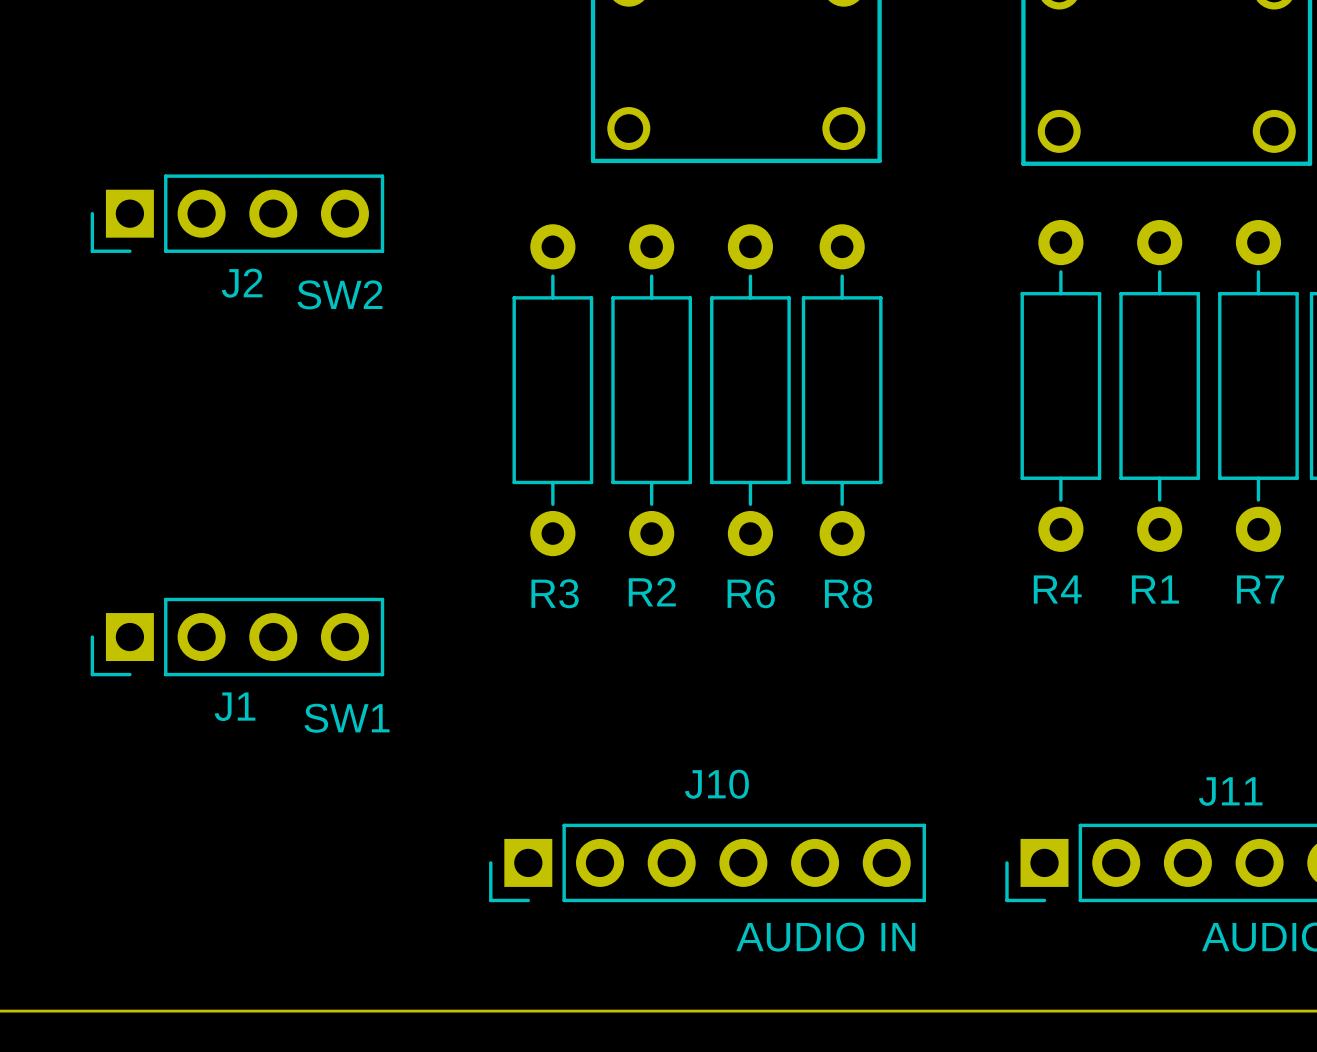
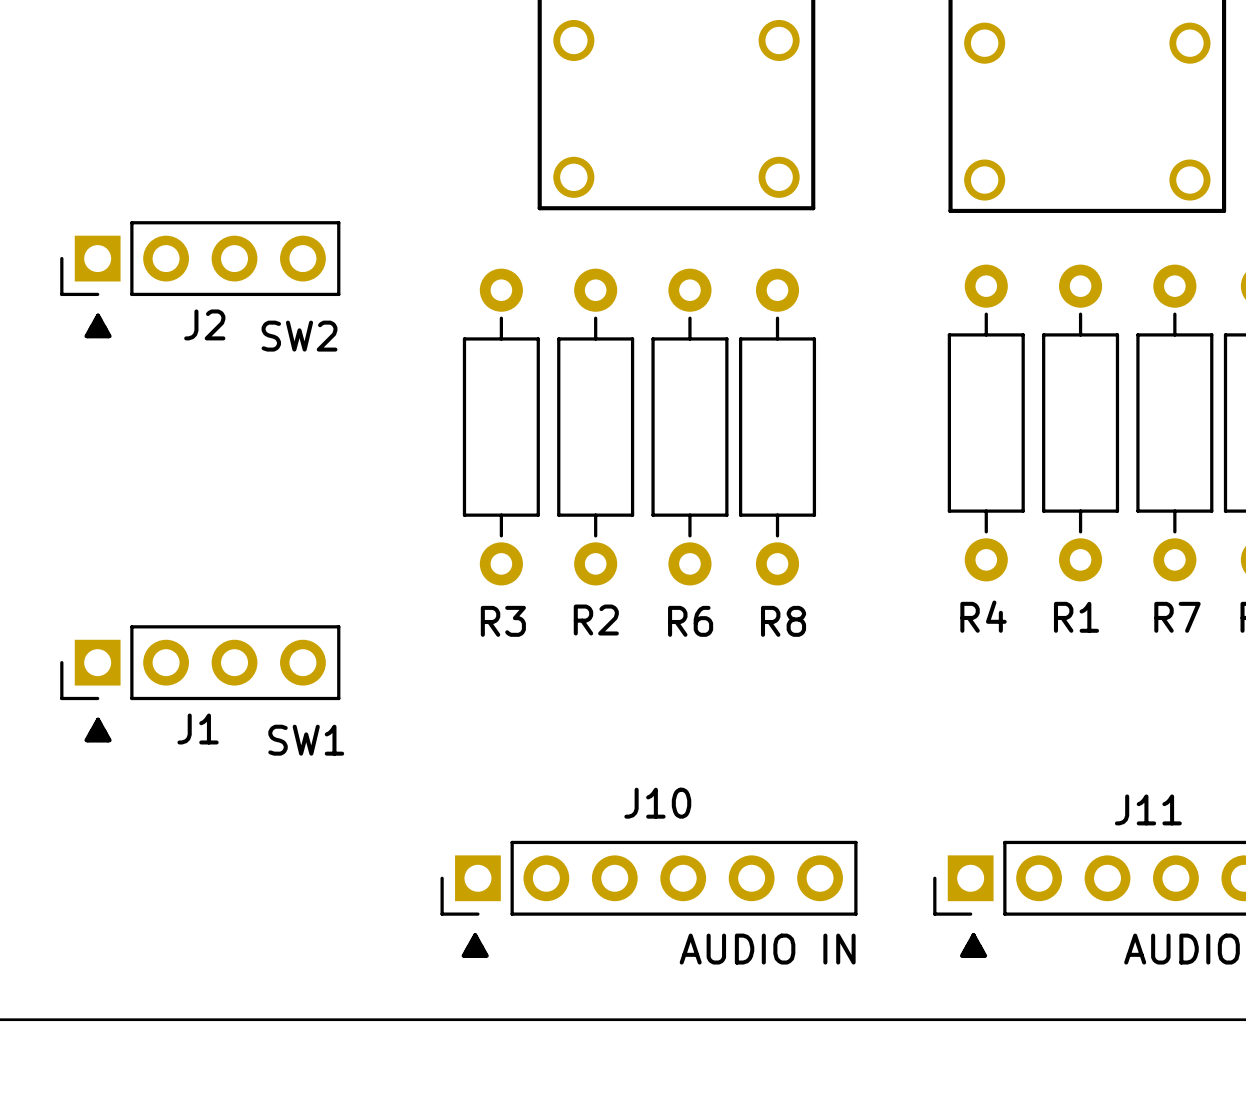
text: none -> ▲ (98, 325)
text: none -> ▲ (98, 730)
text: none -> ▲ (475, 945)
text: none -> ▲ (973, 945)

